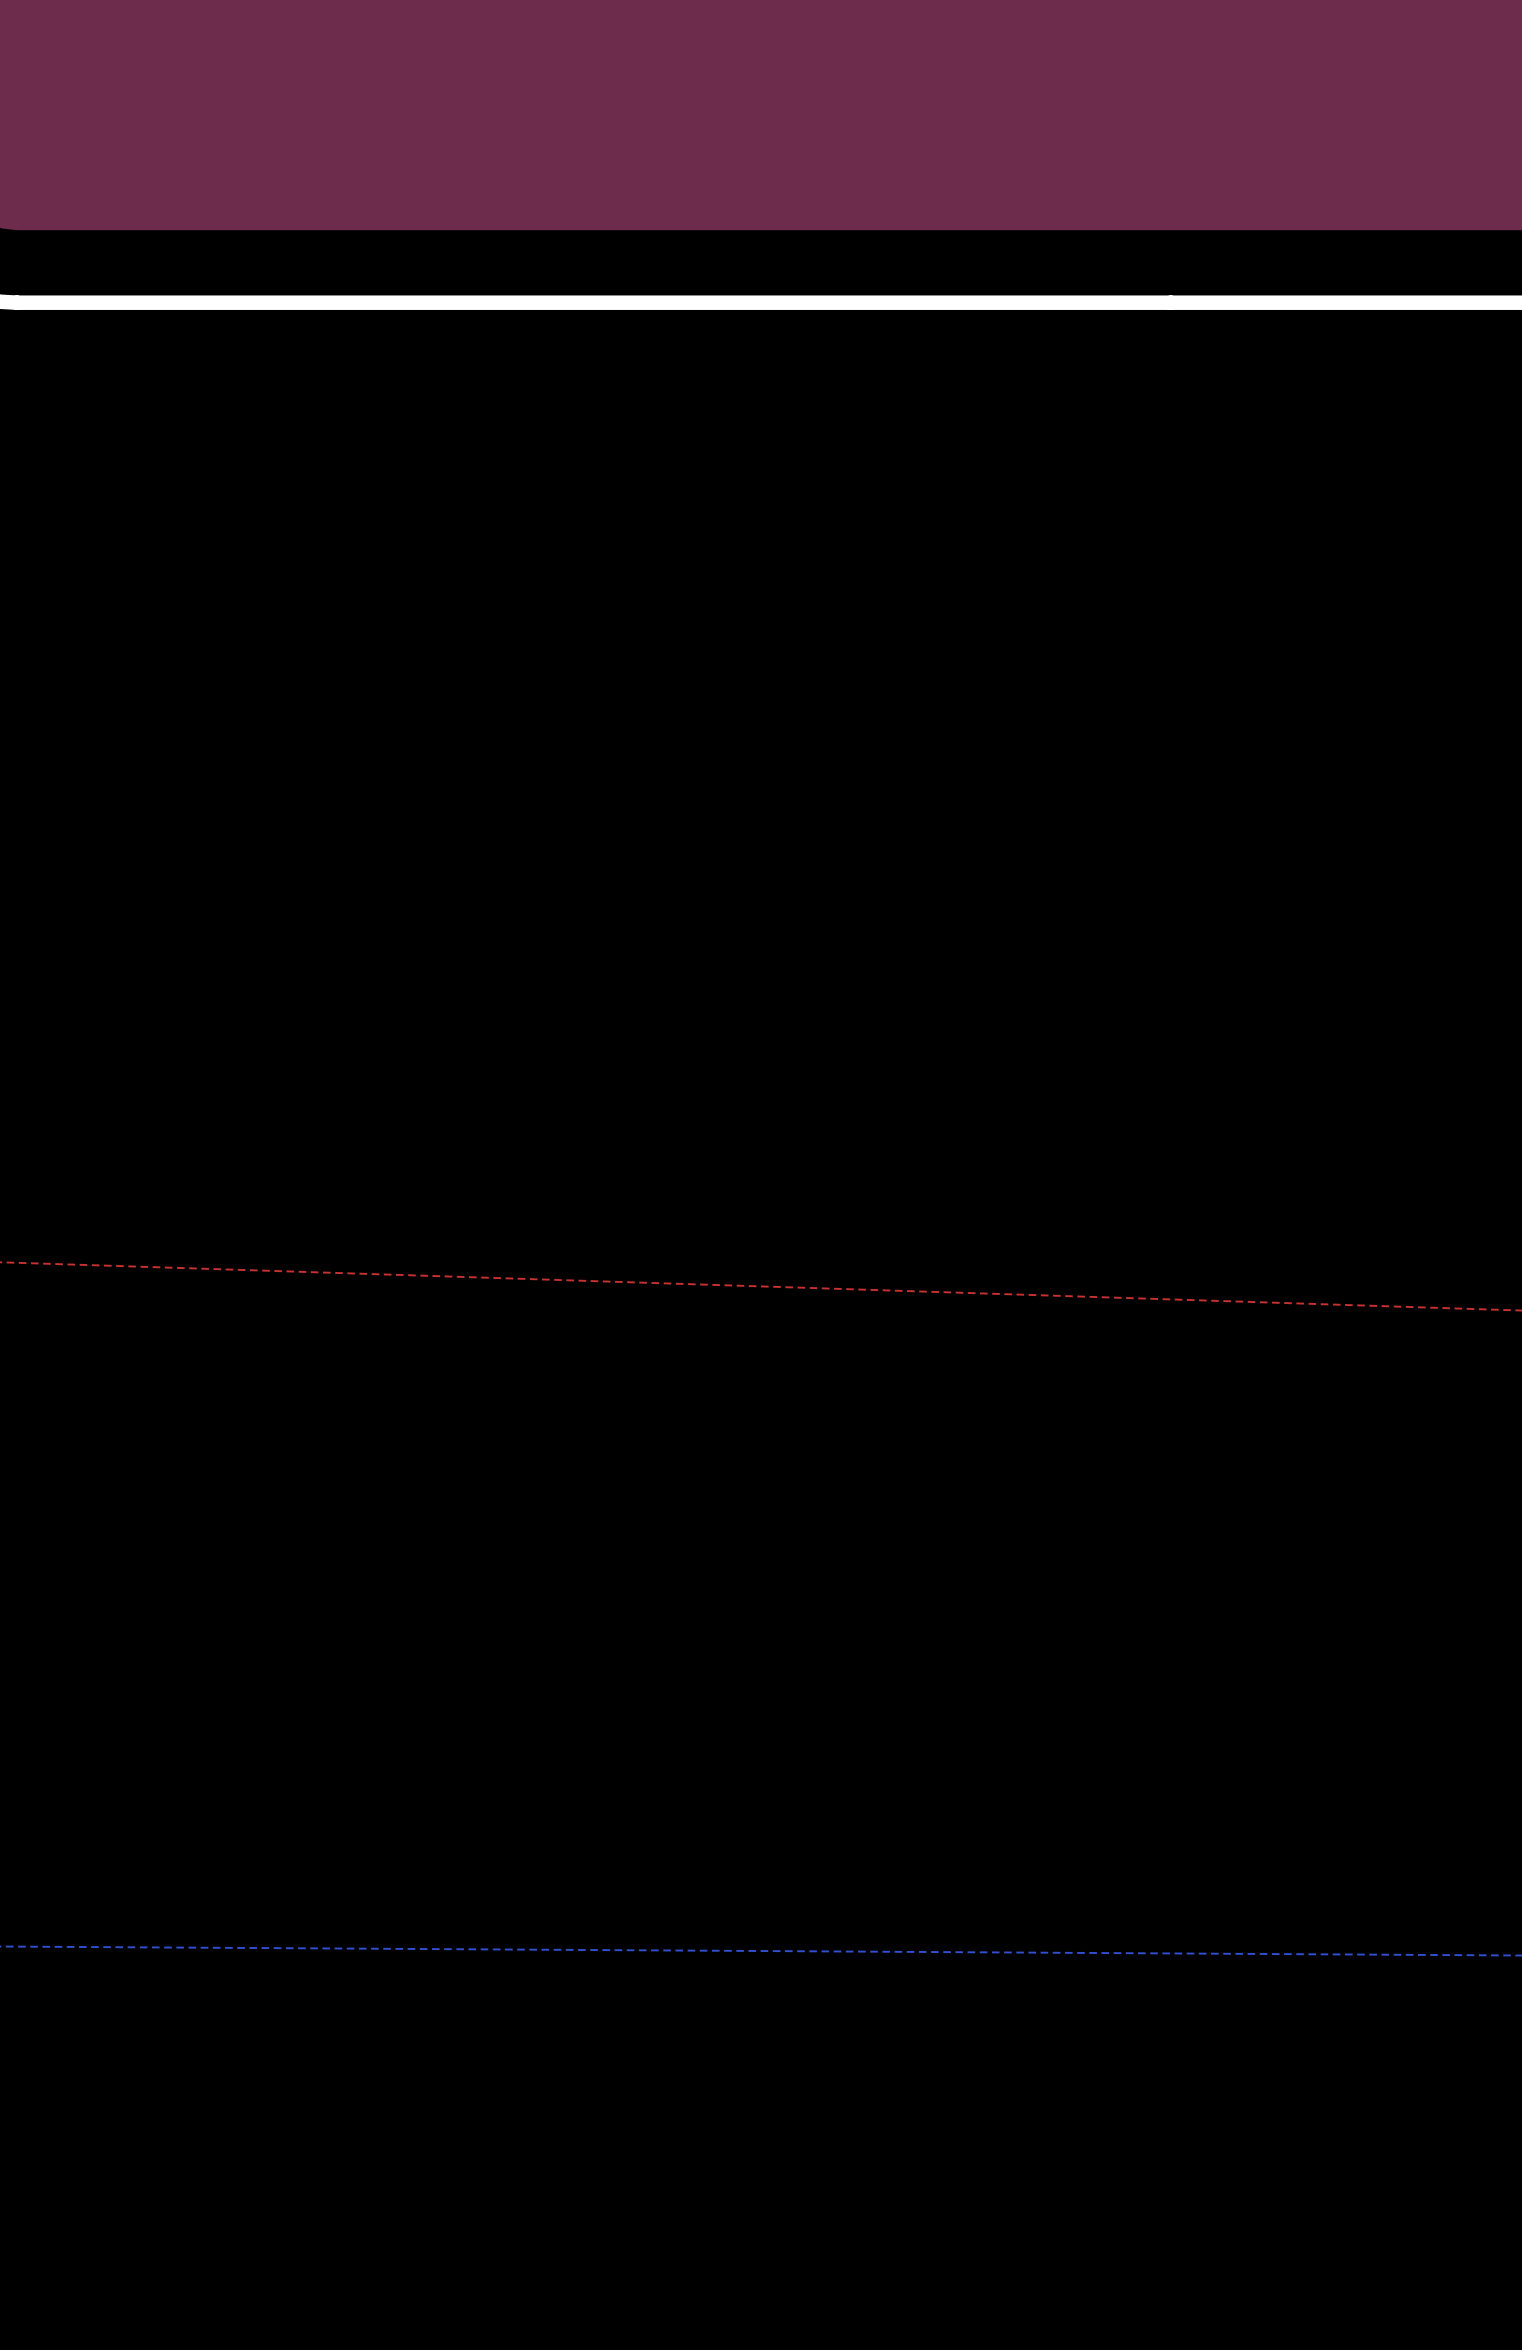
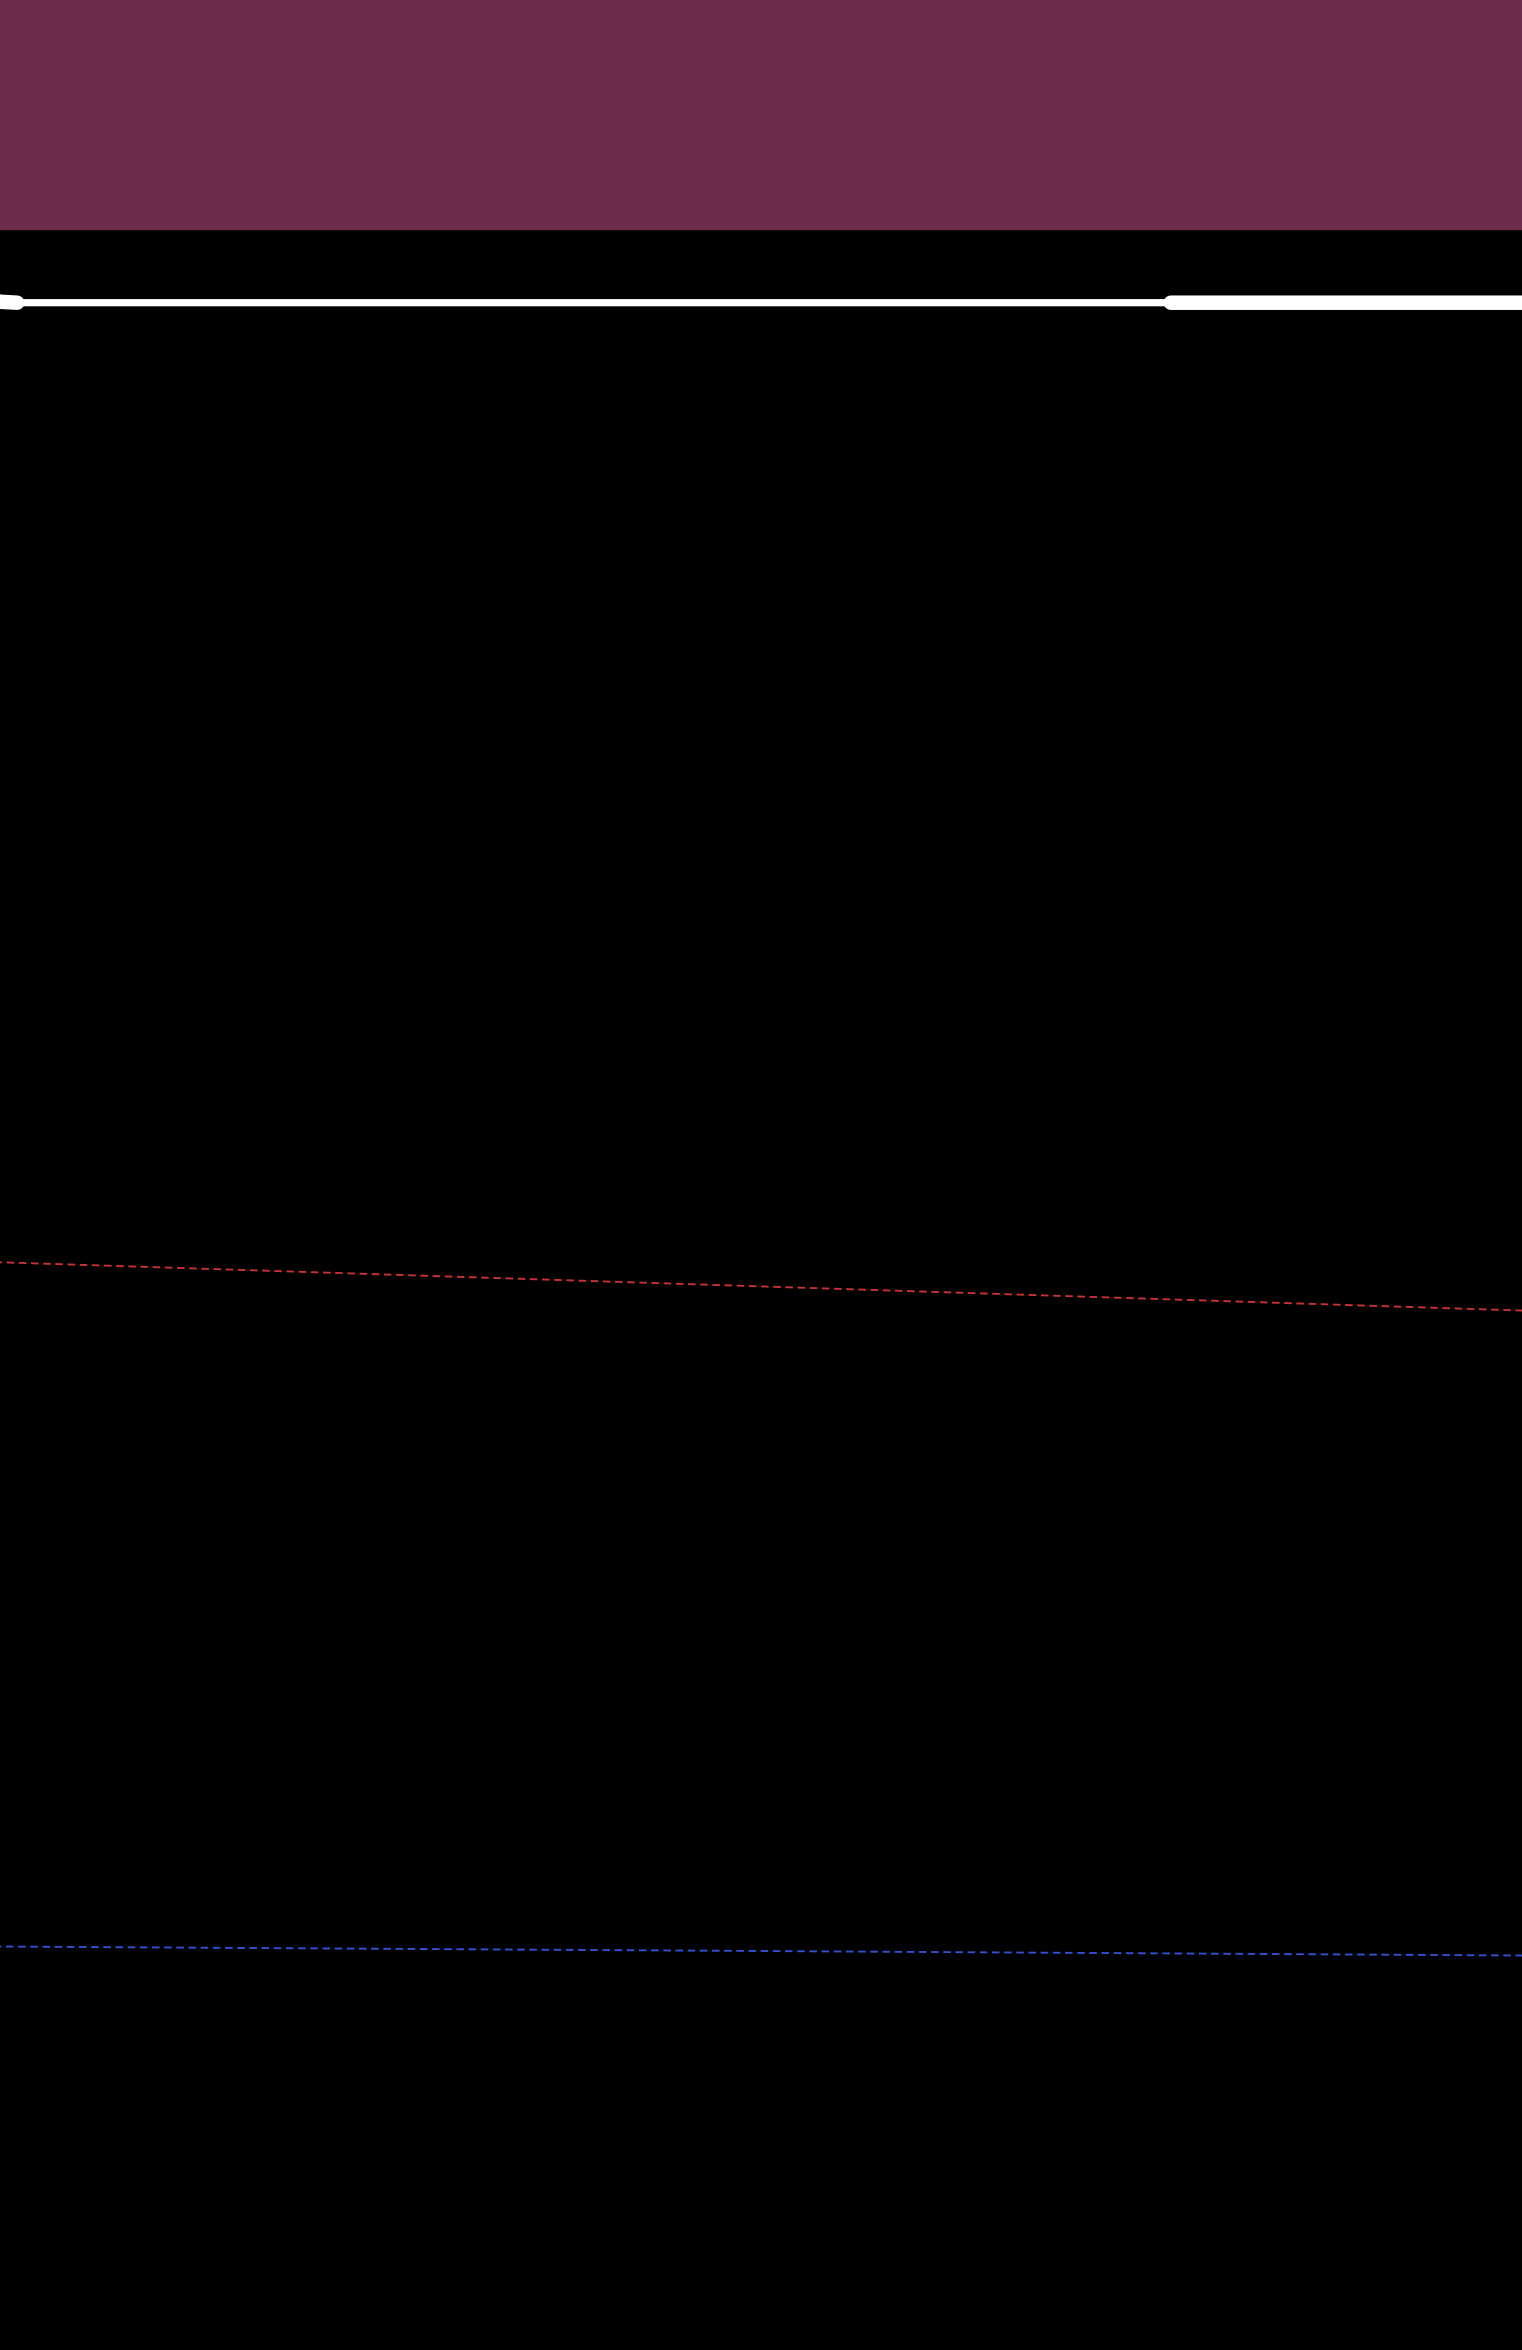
board edge width: thick (17, 302) (1170, 302) -> thin (17, 302) (1170, 302)

